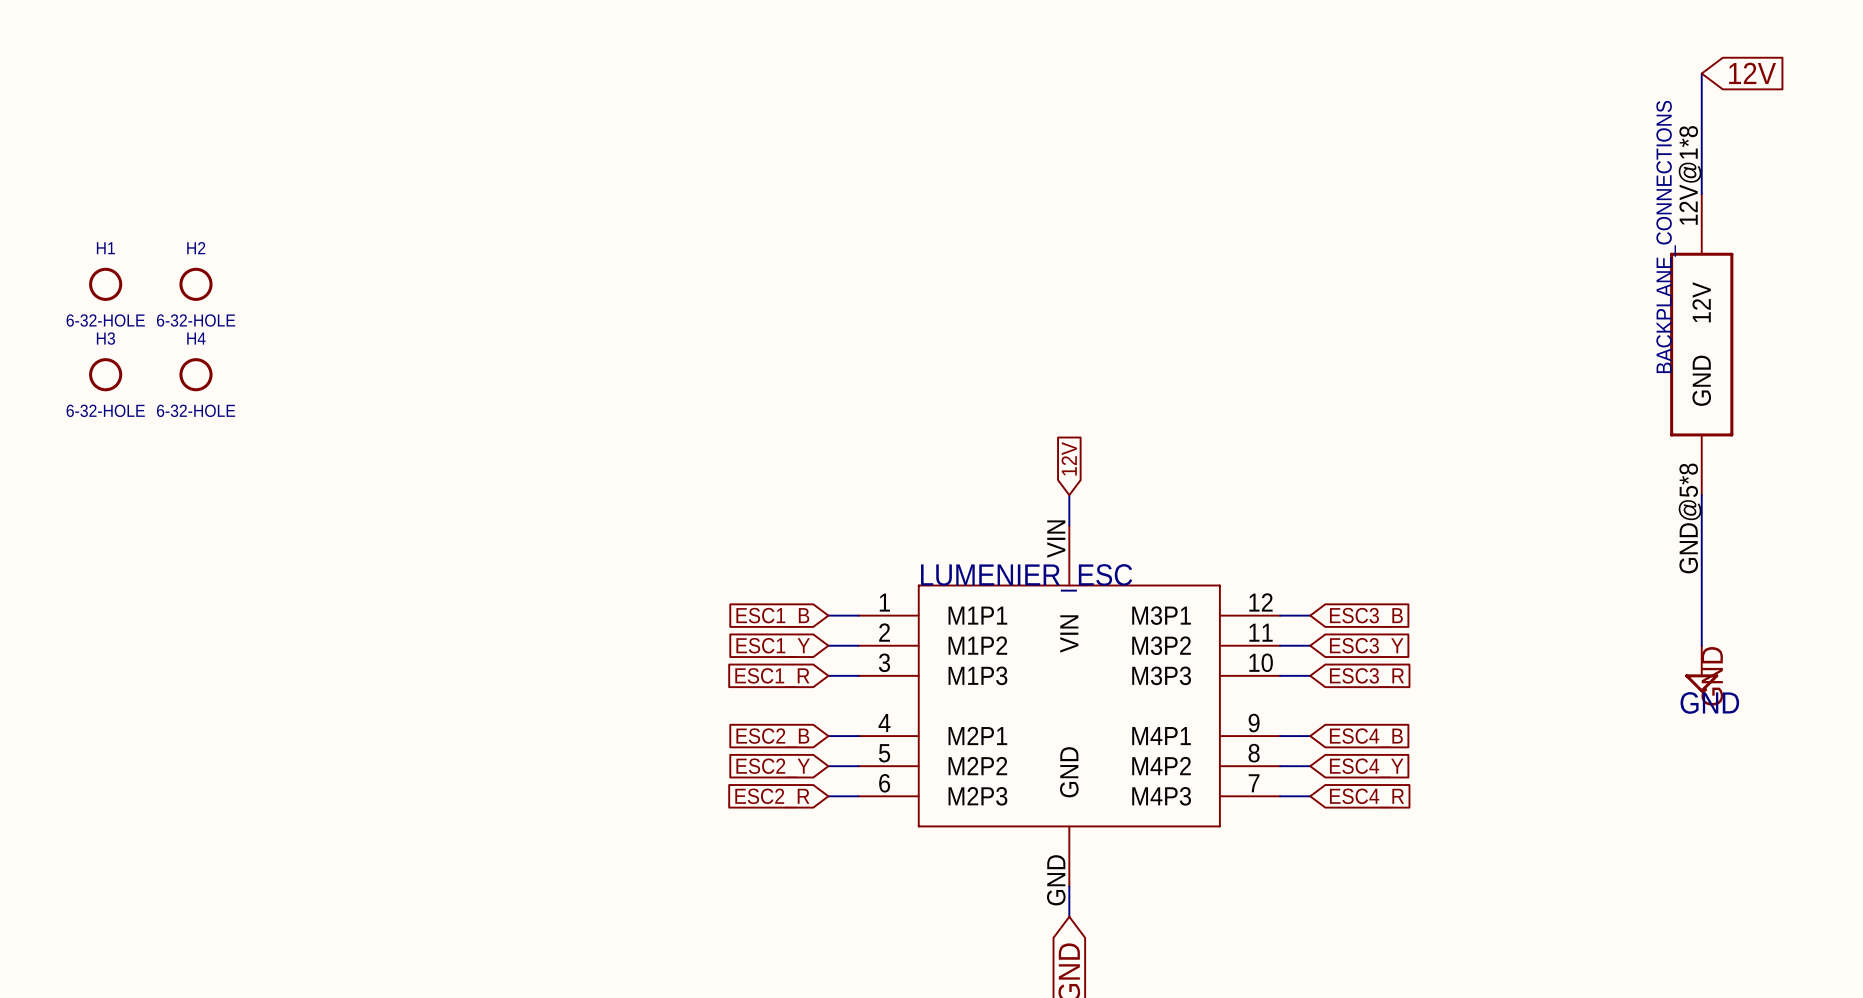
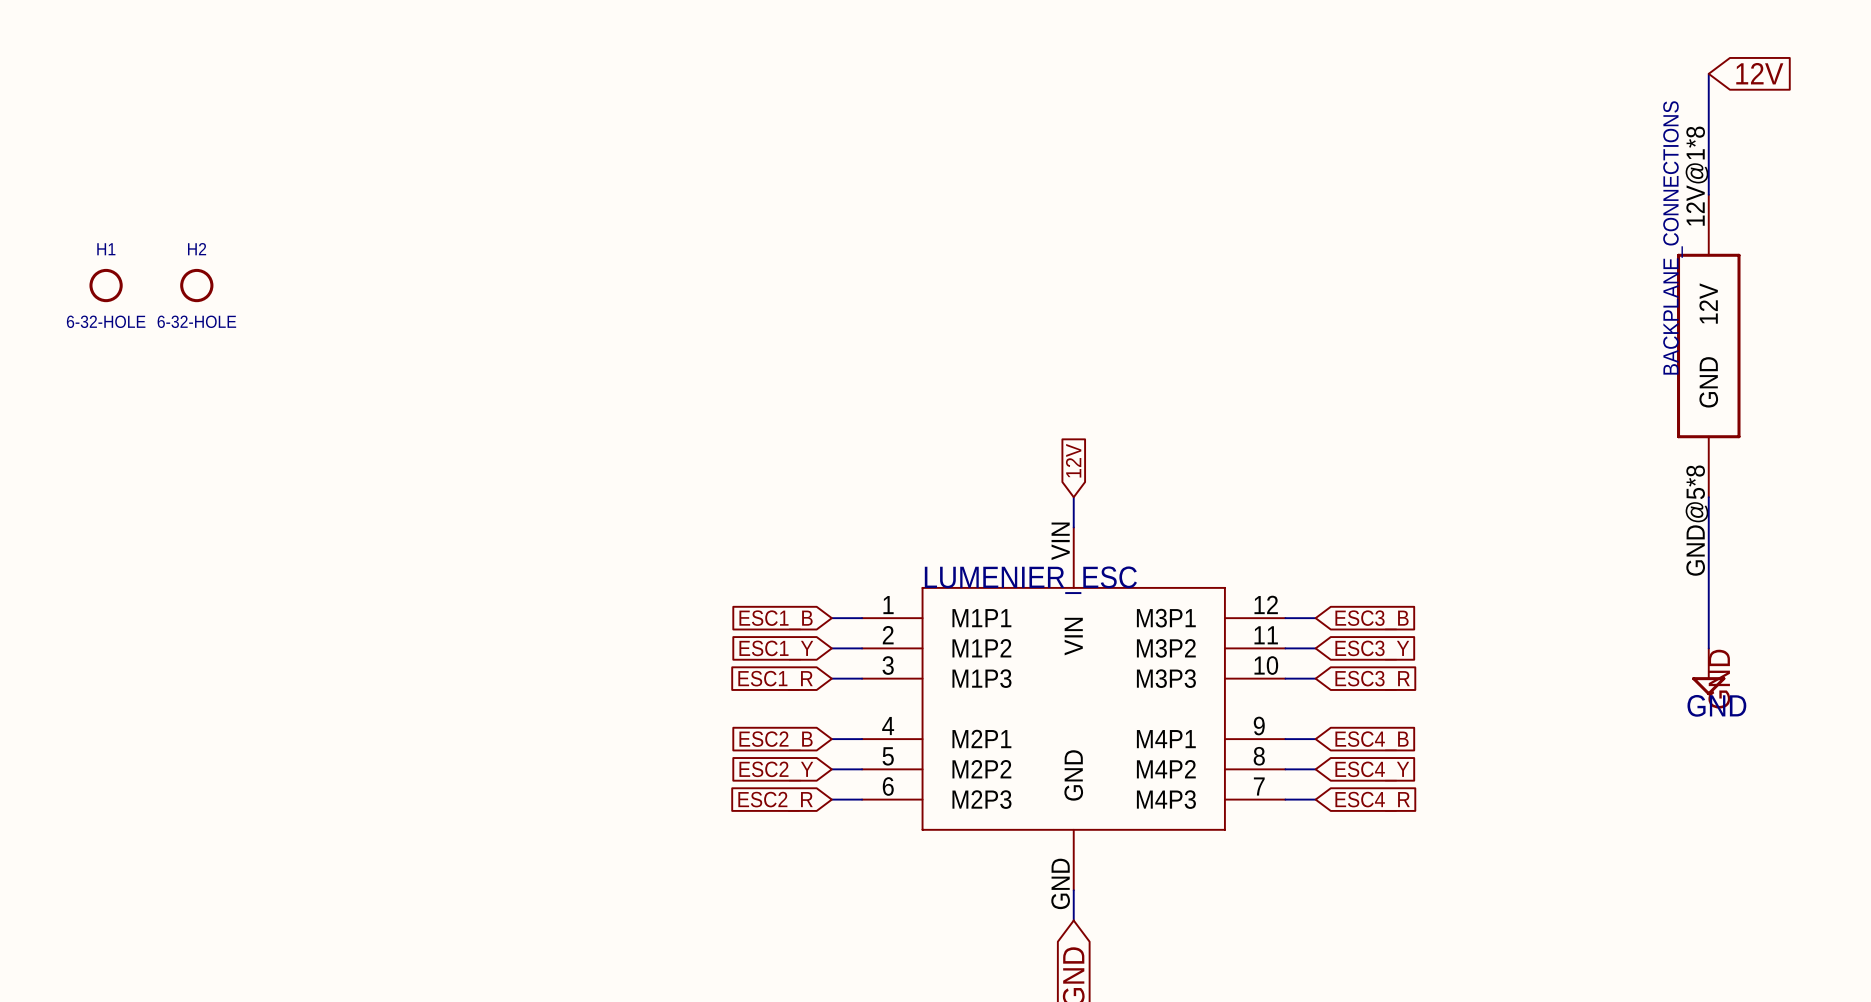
H3: 6-32-HOLE (105, 374) -> none
H4: 6-32-HOLE (195, 374) -> none

